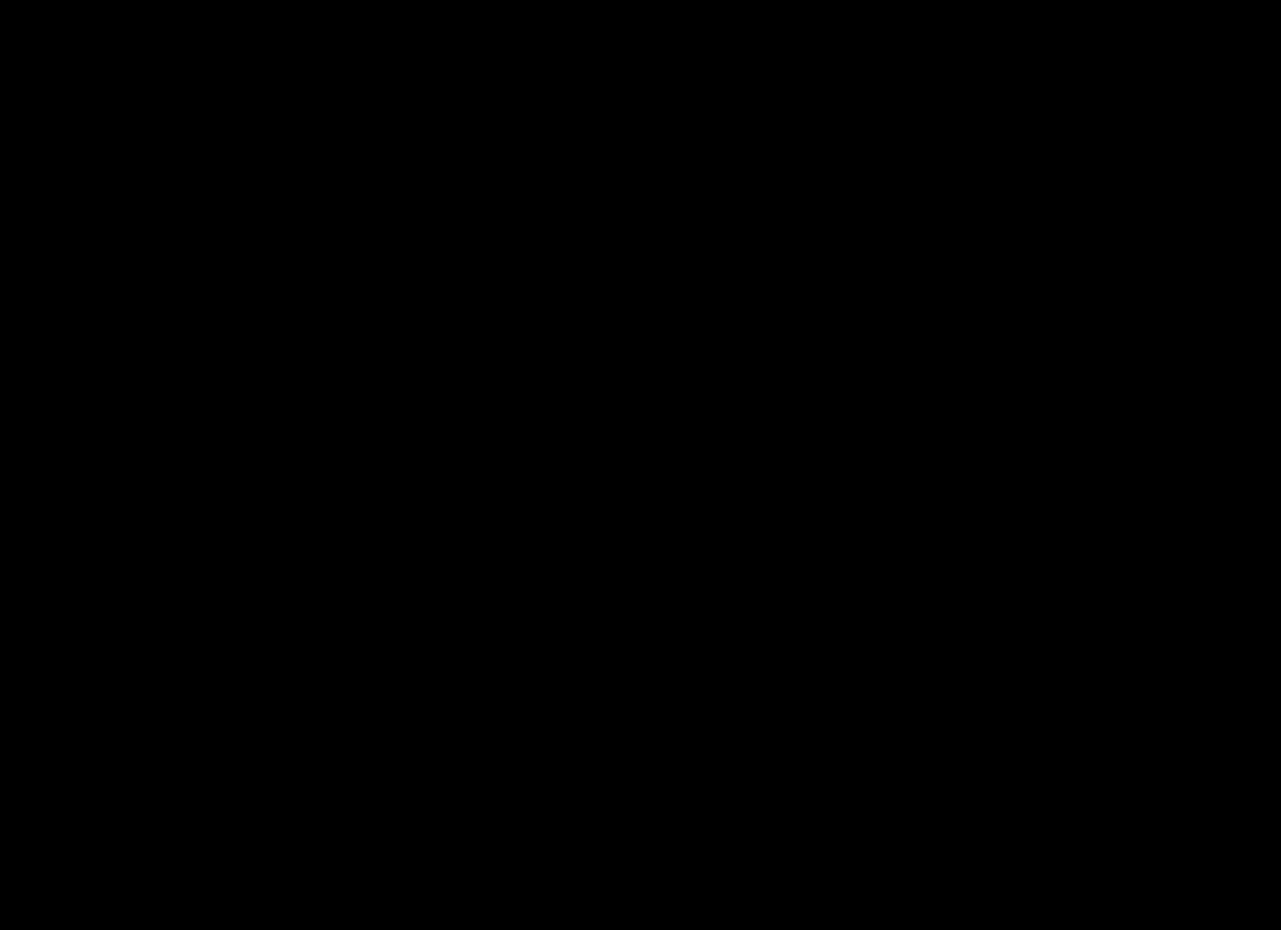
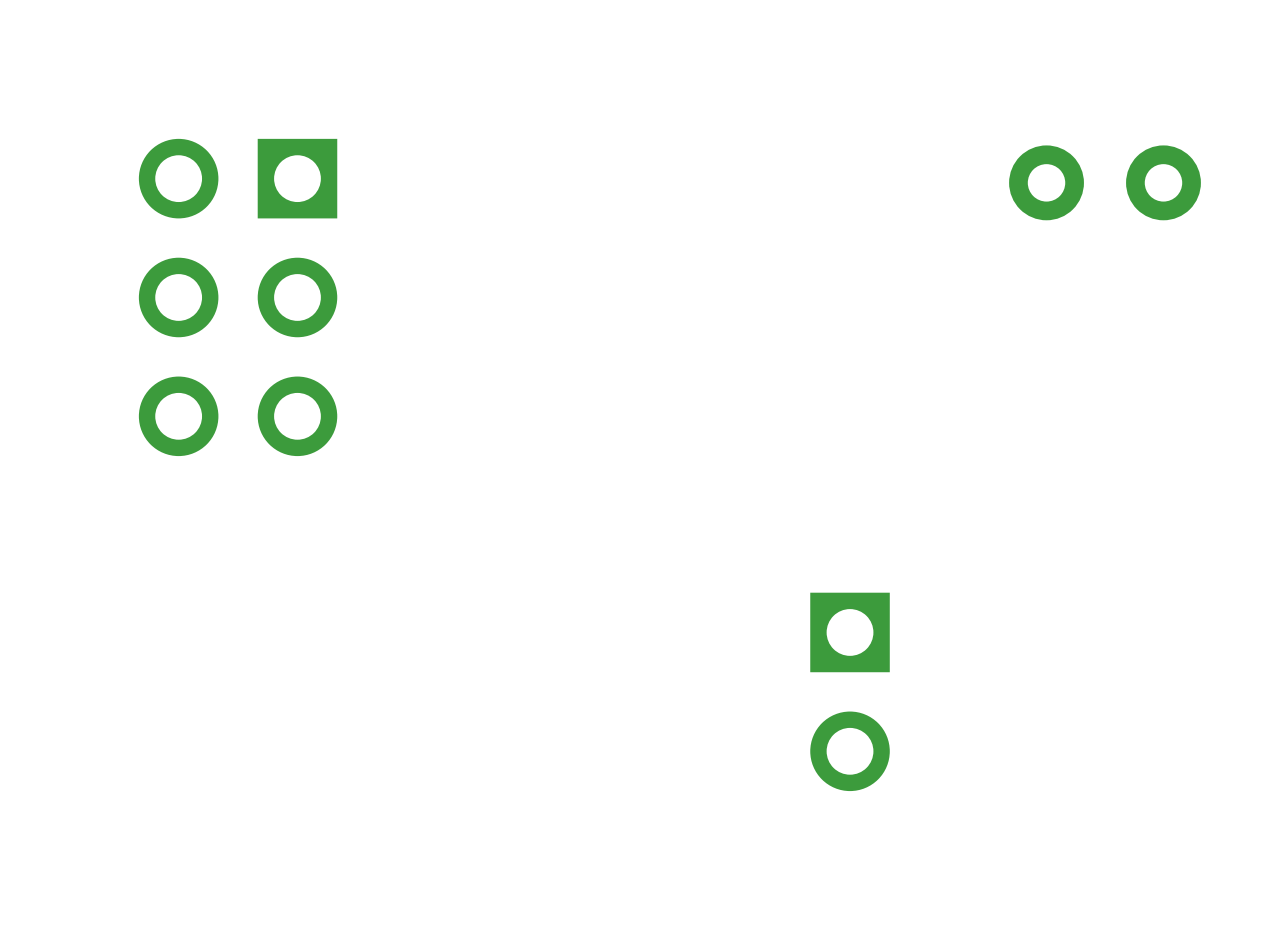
part: none -> (1105, 182)
part: none -> (238, 297)
part: none -> (850, 691)

